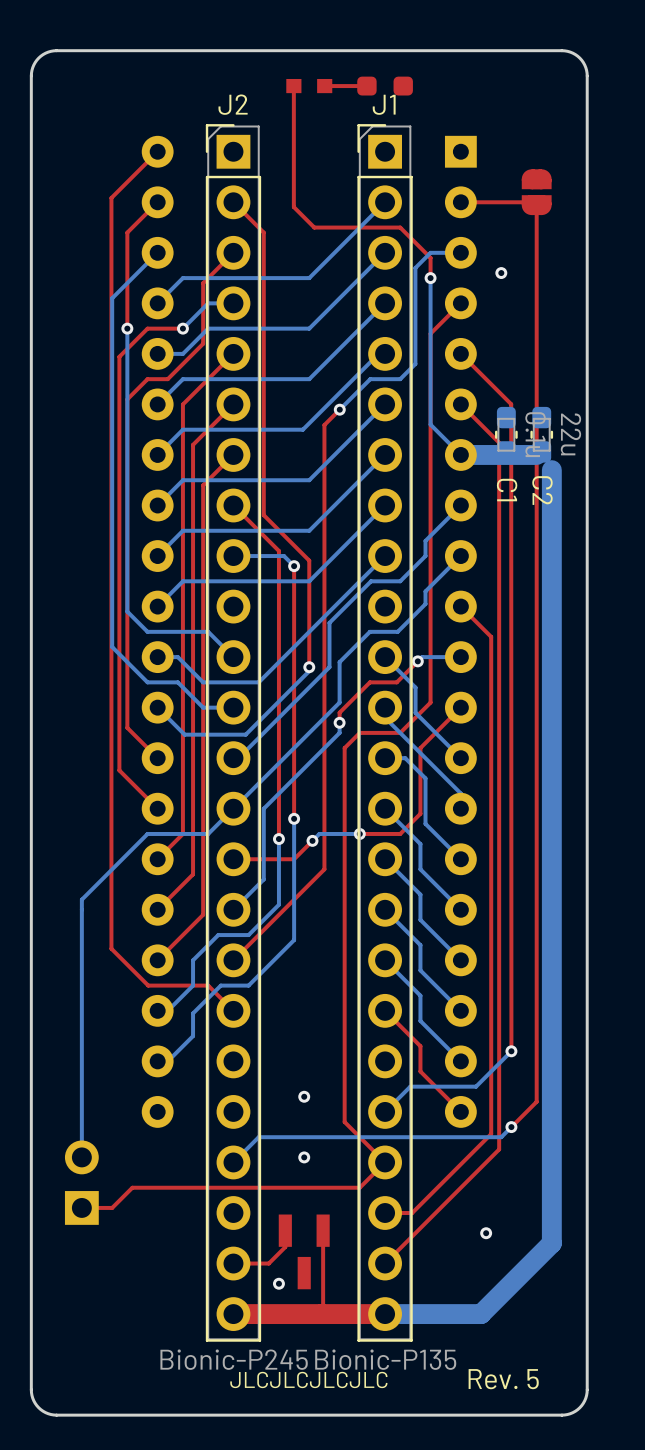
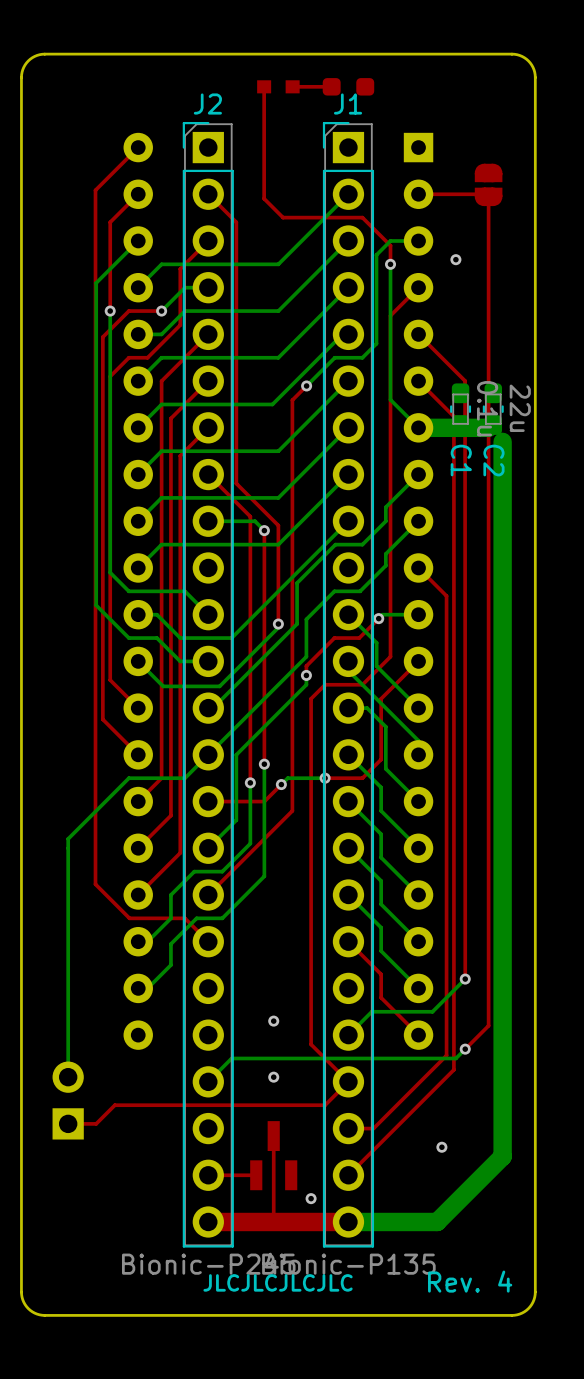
top track: none -> (273, 1136) (273, 1221)
top track: (285, 1230) (285, 1247) (268, 1263) -> (255, 1175) (241, 1175)
top track: (323, 1230) (321, 1314) -> none
part rotation: 0° (304, 1251) -> 180° (273, 1155)
via position: (278, 1283) -> (311, 1198)
text: Rev. 5 (503, 1379) -> Rev. 4 (470, 1281)

